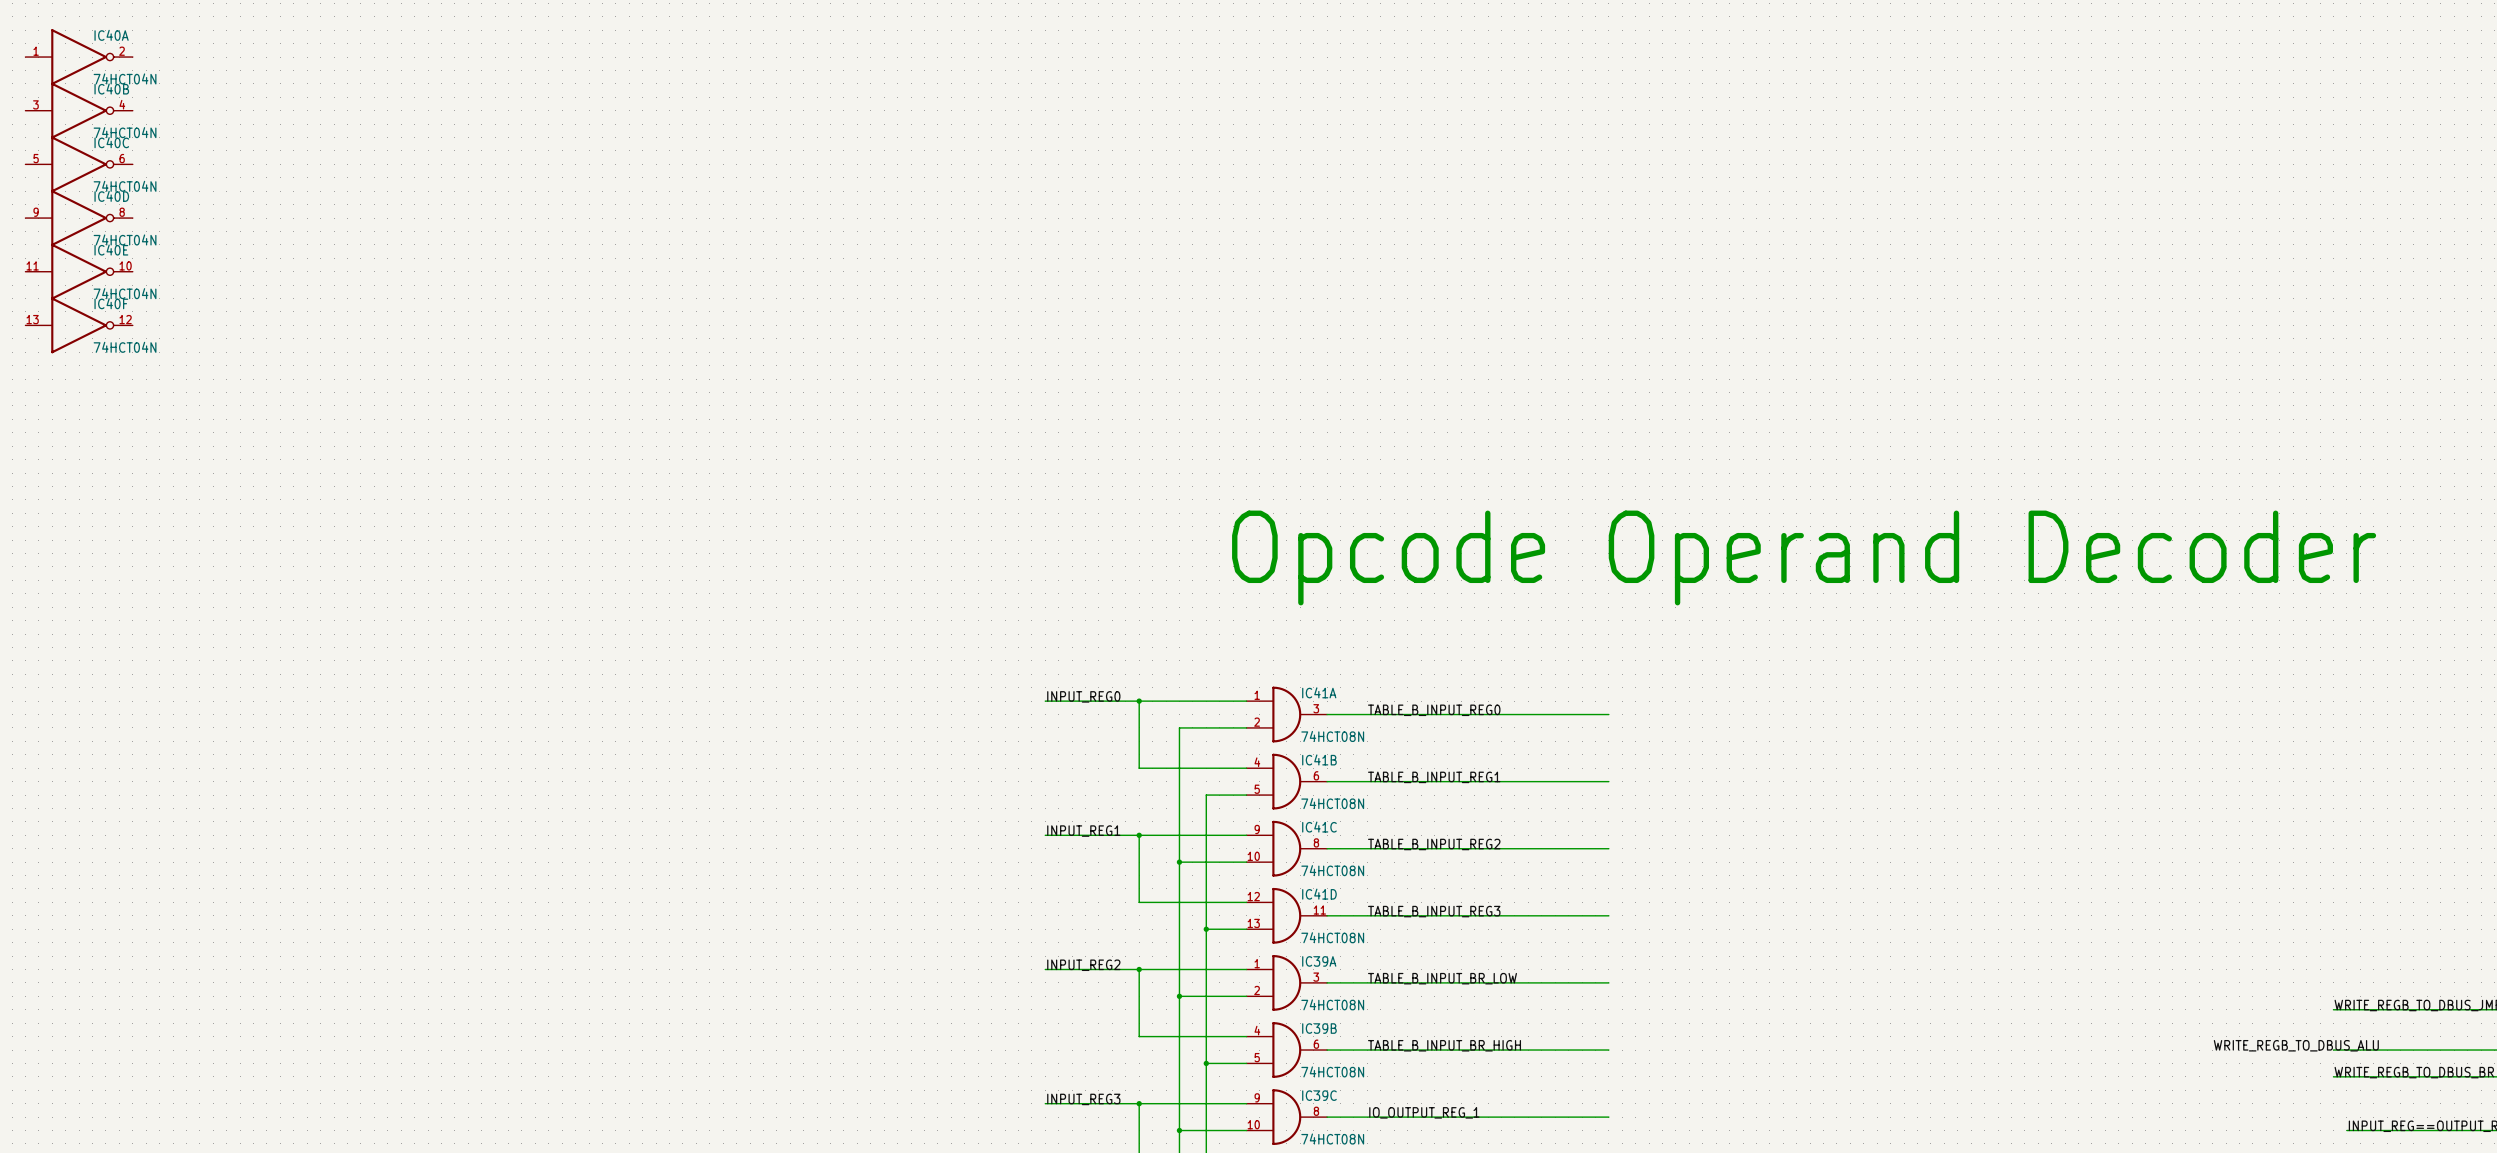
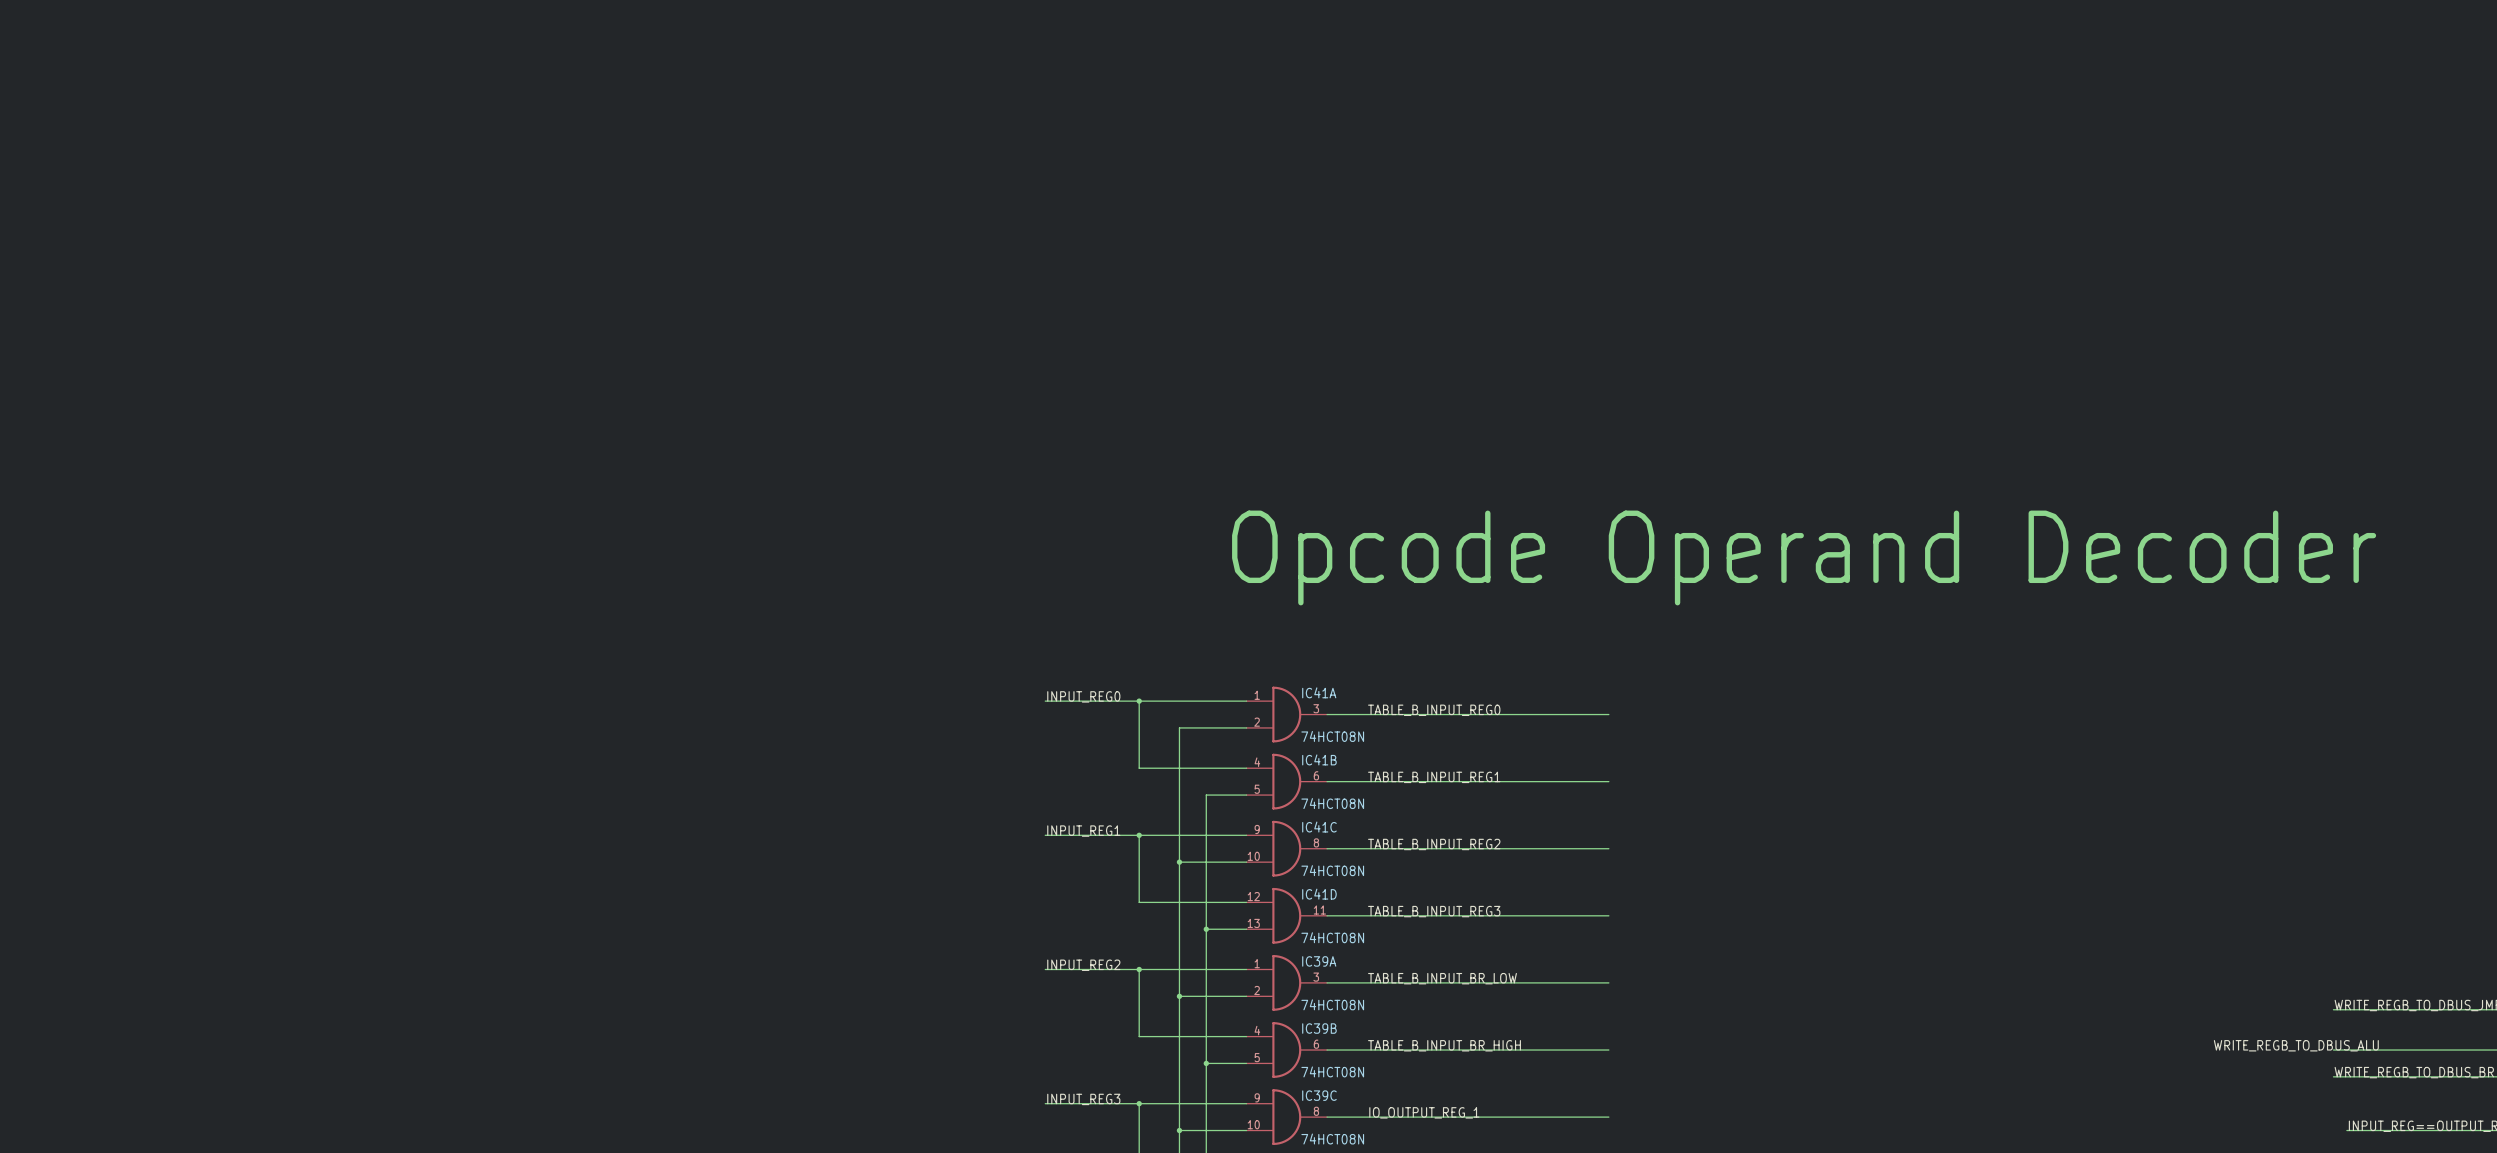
IC40A: 74HCT04N (79, 57) -> none
IC40B: 74HCT04N (79, 110) -> none
IC40C: 74HCT04N (79, 164) -> none
IC40D: 74HCT04N (79, 218) -> none
IC40E: 74HCT04N (79, 271) -> none
IC40F: 74HCT04N (79, 325) -> none

